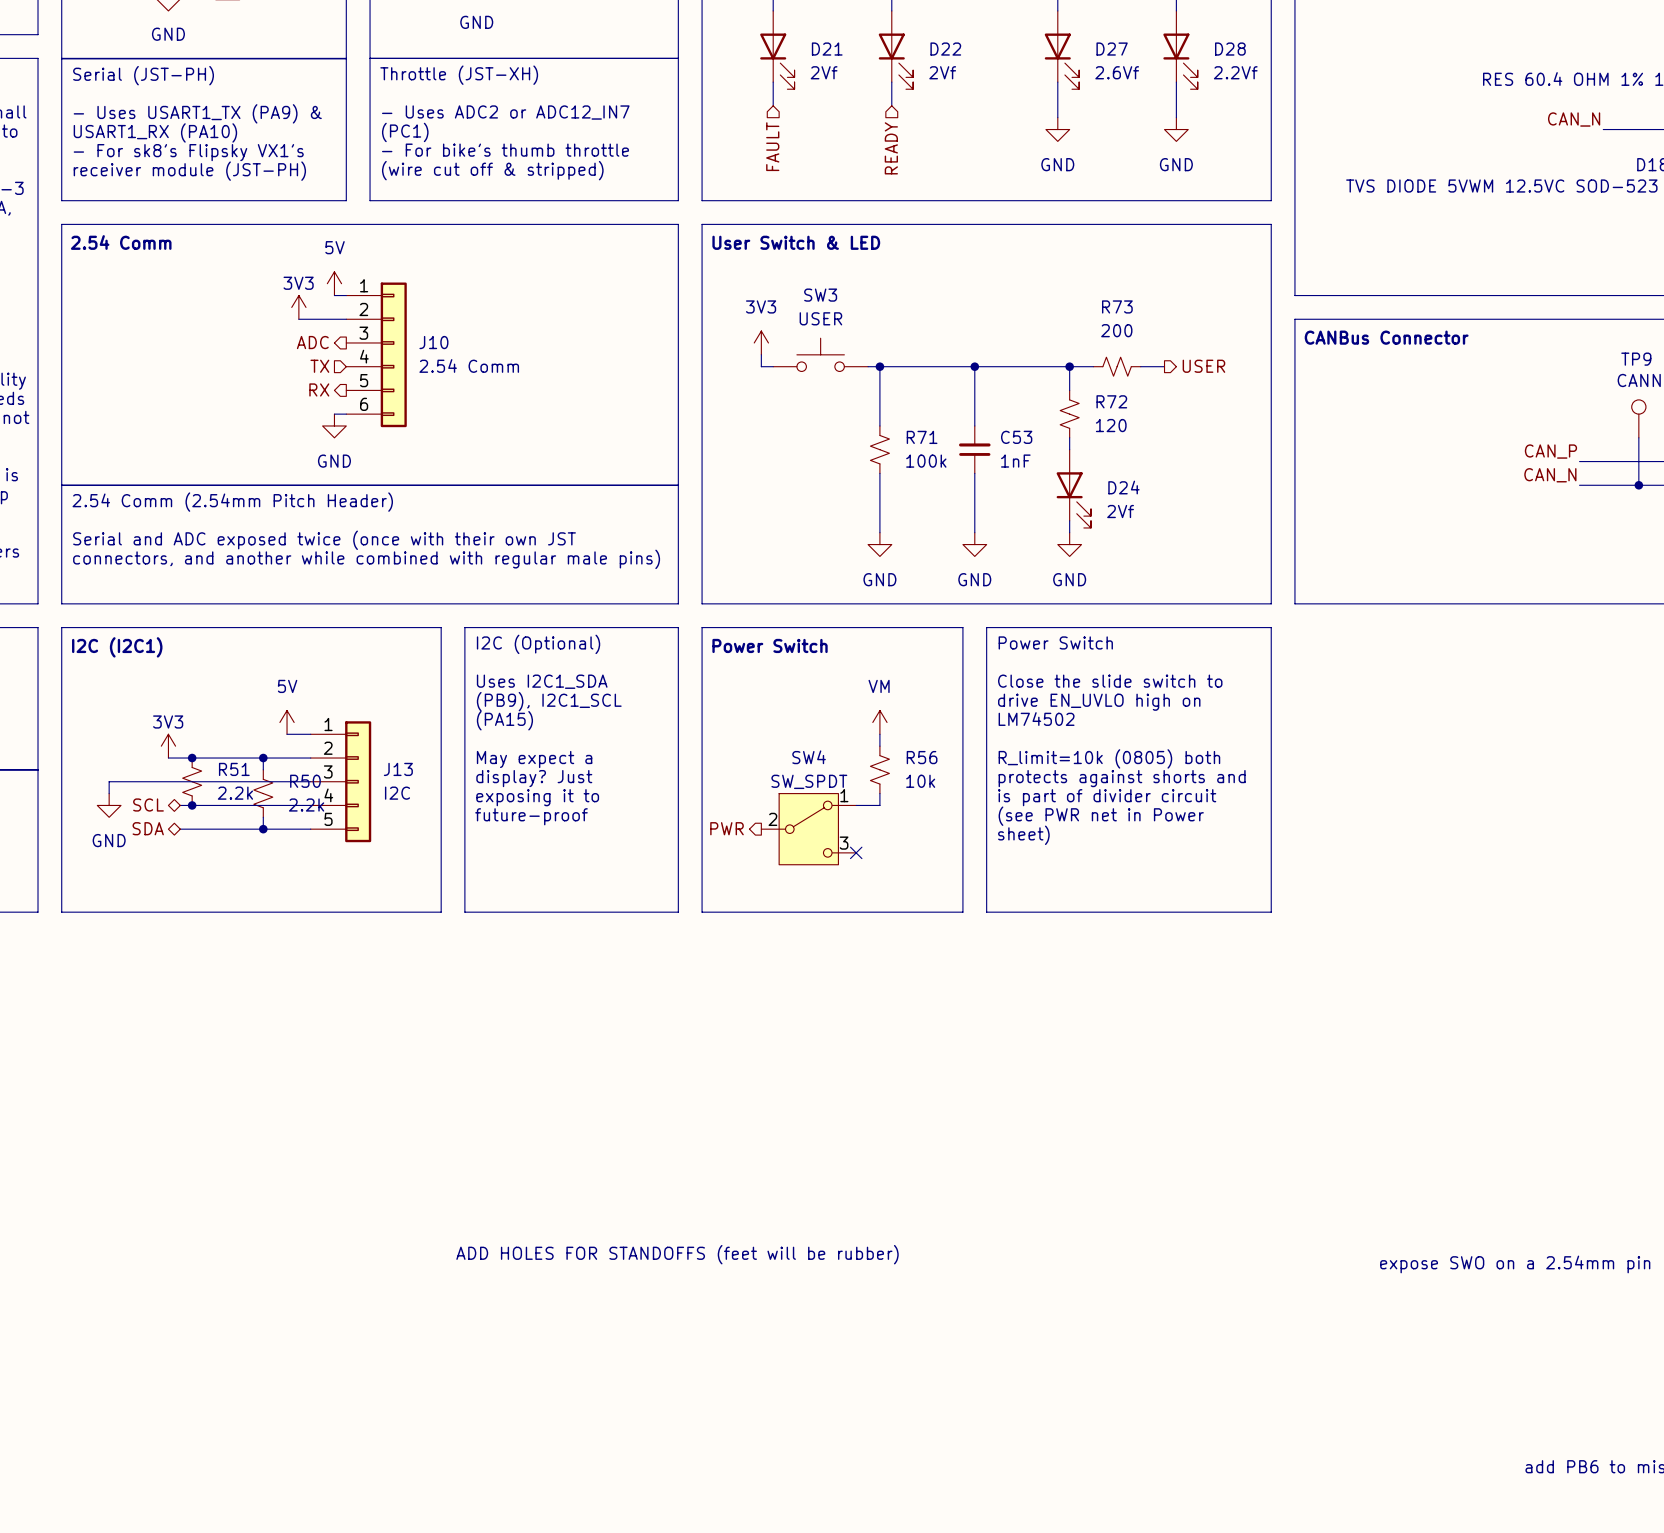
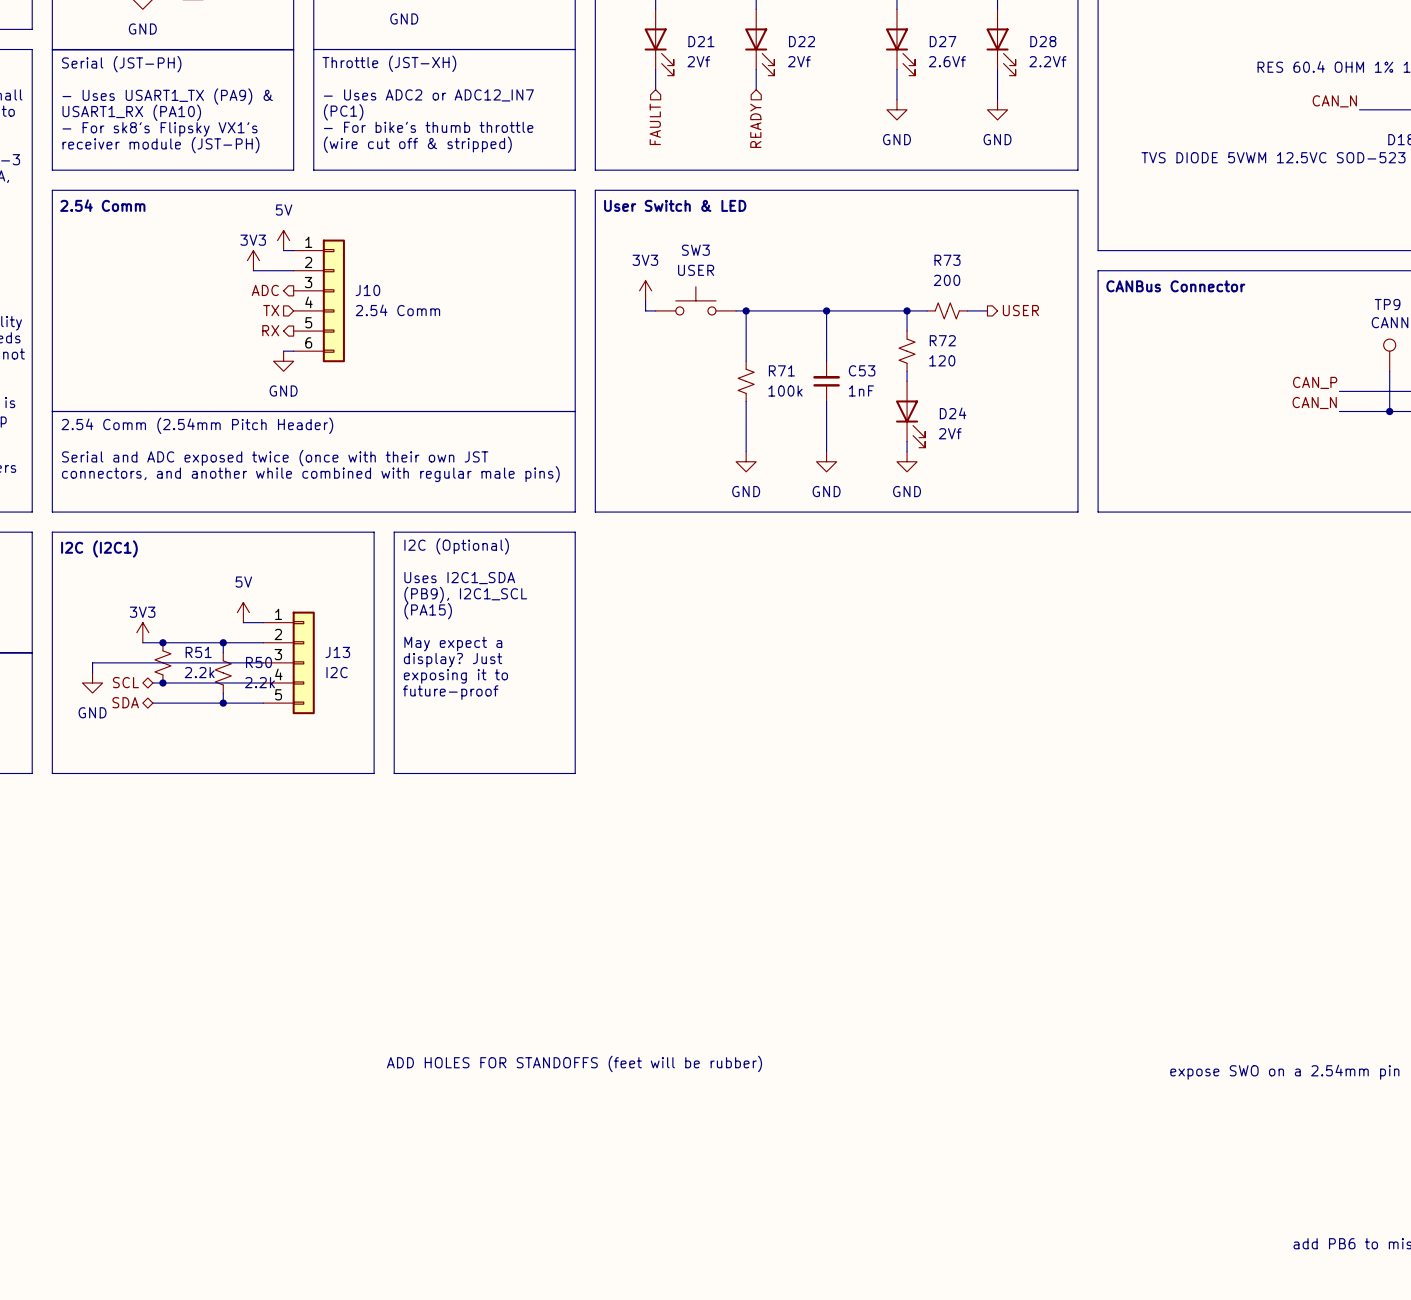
line: (702, 627) (962, 627) (962, 912) (702, 912) (702, 627) -> none
line: (986, 627) (1271, 627) (1271, 912) (986, 912) (986, 627) -> none
text: Power Switch (1055, 642) -> none
text: Power Switch (770, 645) -> none
text: Close the slide switch to (1110, 681) -> none
text: drive EN_UVLO high on (1099, 702) -> none
text: LM74502 (1036, 719) -> none
power symbol: VM (879, 722) -> none
wire: (879, 734) (879, 746) -> none
text: R_limit=10k (0805) both (1109, 758) -> none
R56: 10k (879, 769) -> none
text: protects against shorts and (1122, 778) -> none
wire: (879, 793) (879, 805) (856, 805) -> none
text: is part of divider circuit (1107, 797) -> none
text: (see PWR net in Power (1101, 816) -> none
hierarchical label: PWR (727, 828) -> none
SW4: SW_SPDT (808, 829) -> none
text: sheet) (1023, 835) -> none
no-connect mark: (856, 852) -> none

